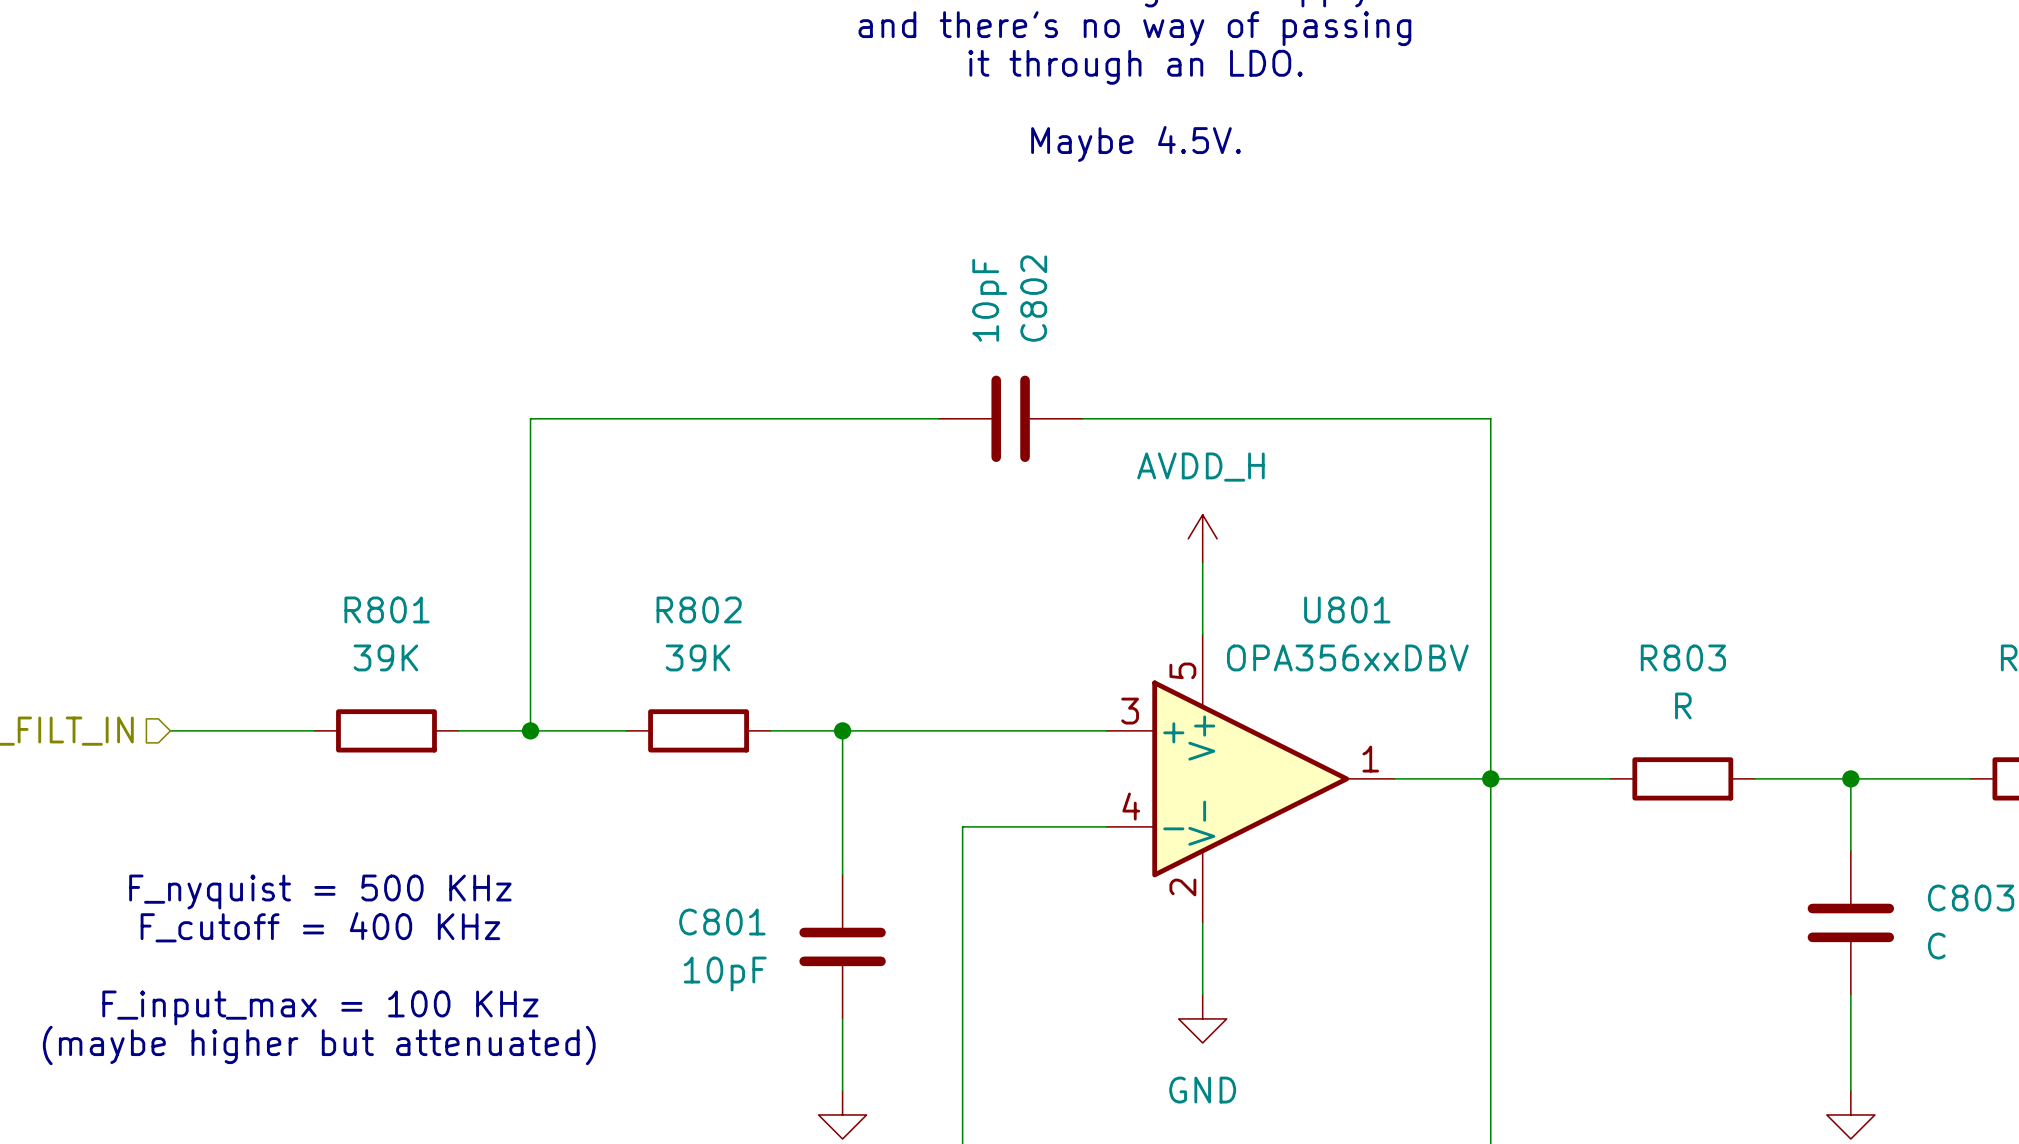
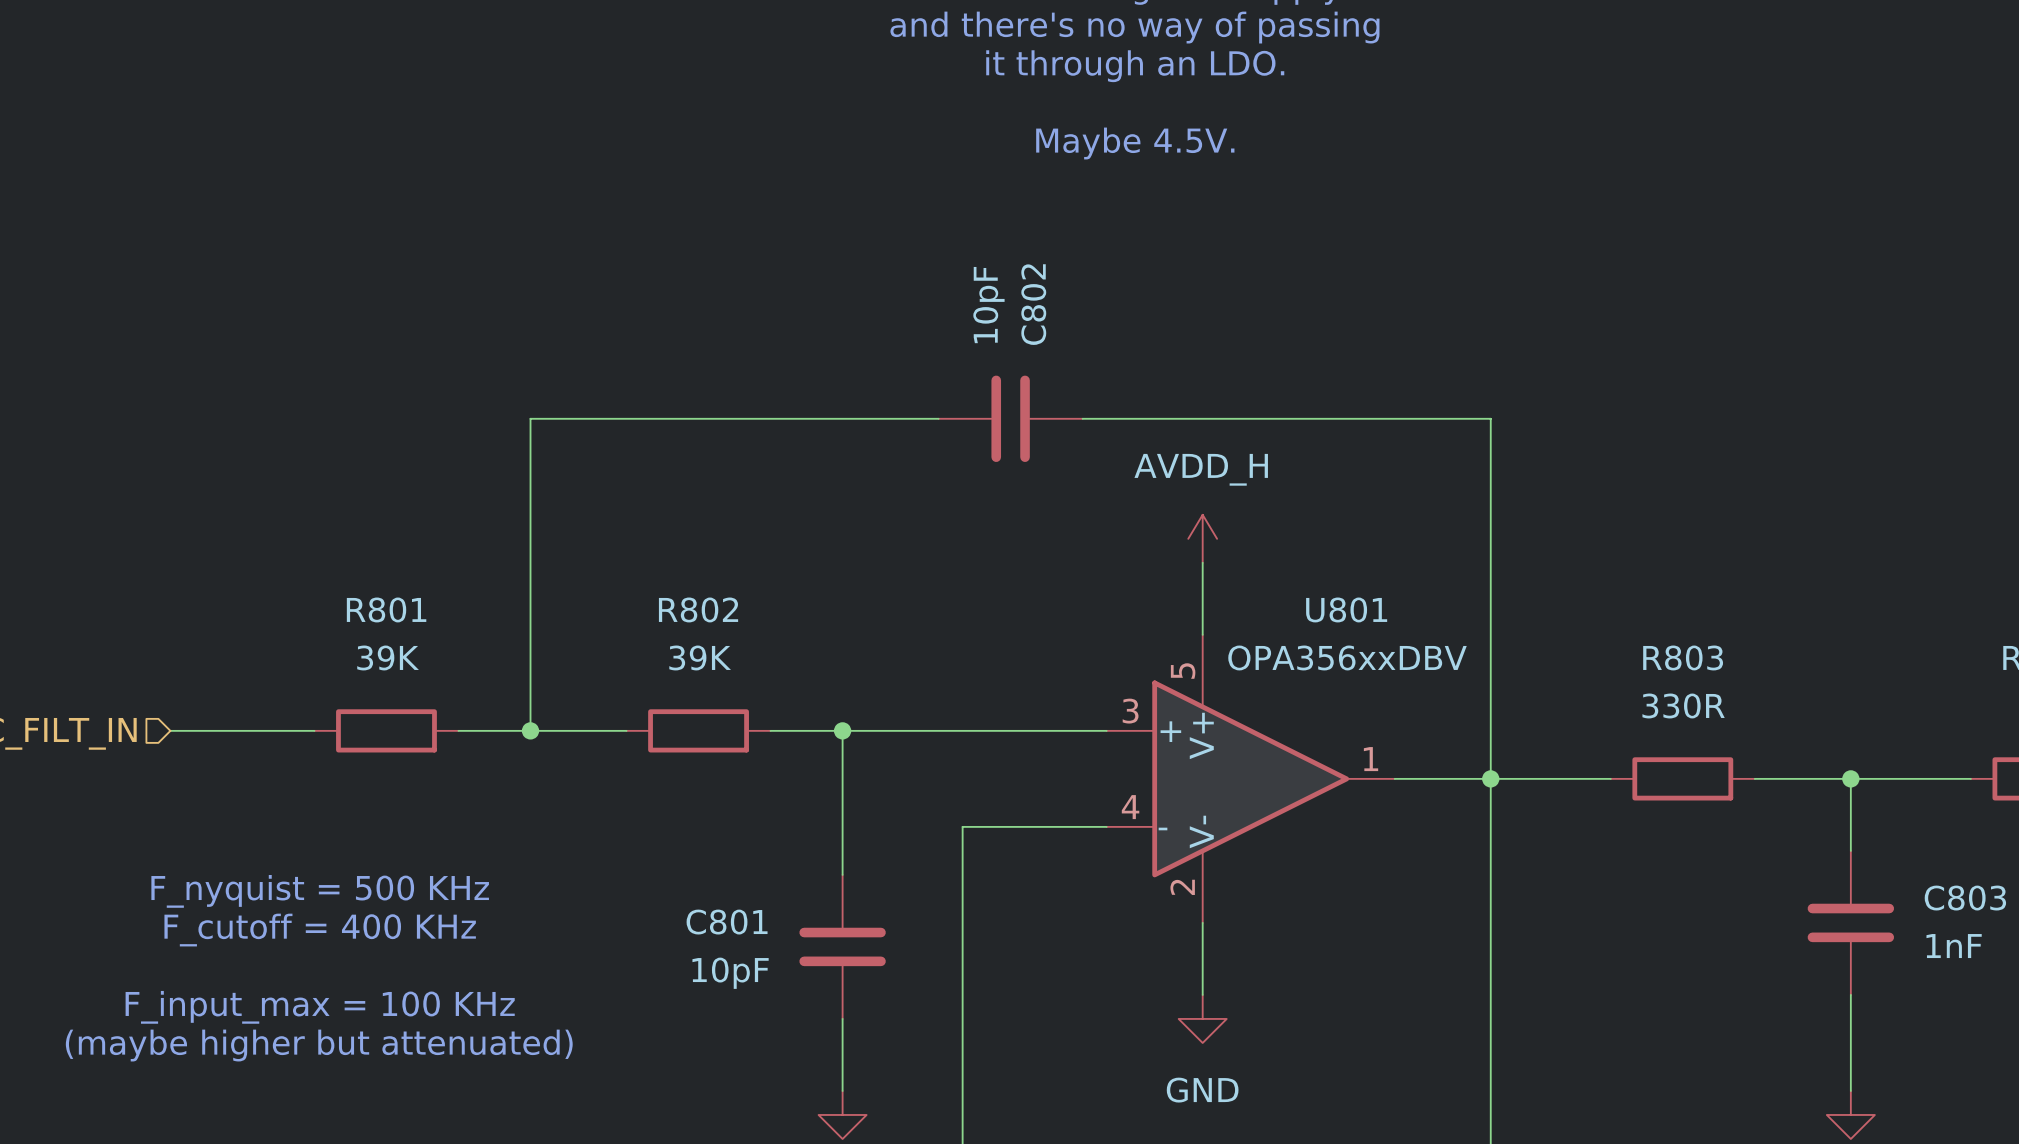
R803 value: R (1683, 705) -> 330R (1683, 705)
C803 value: C (1936, 946) -> 1nF (1954, 946)

